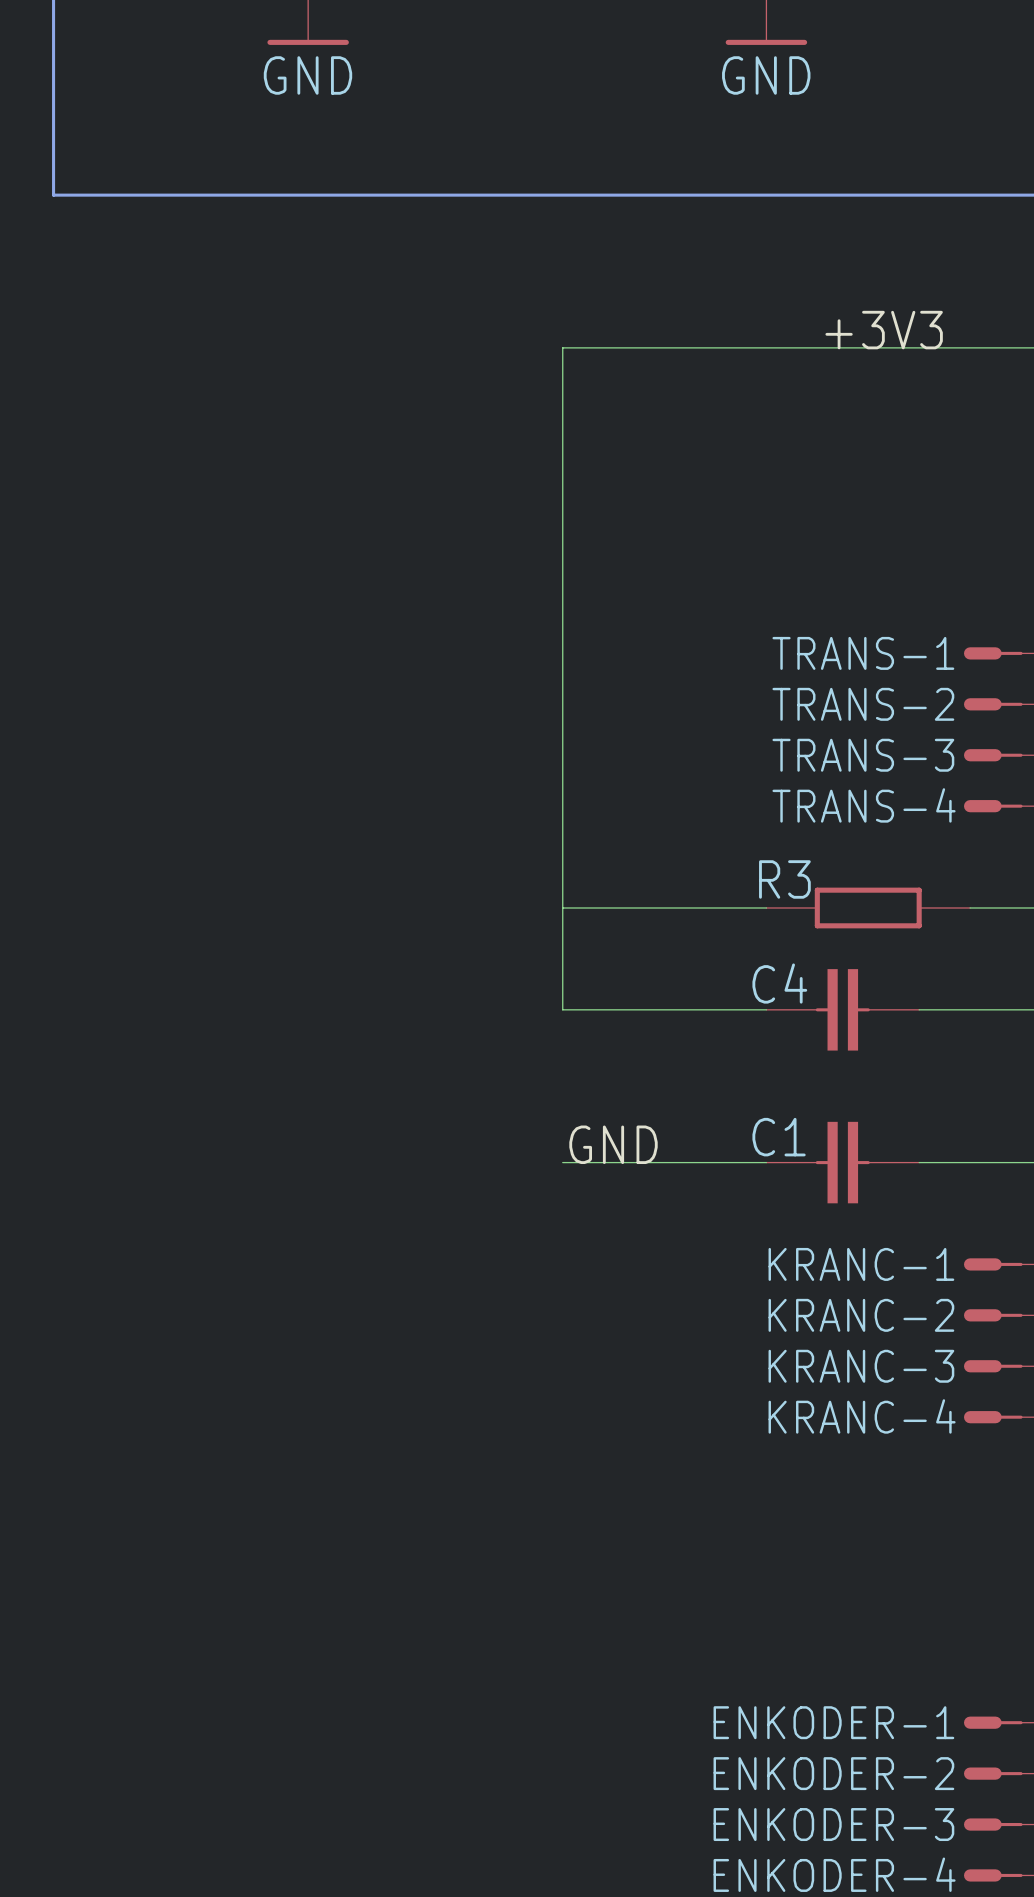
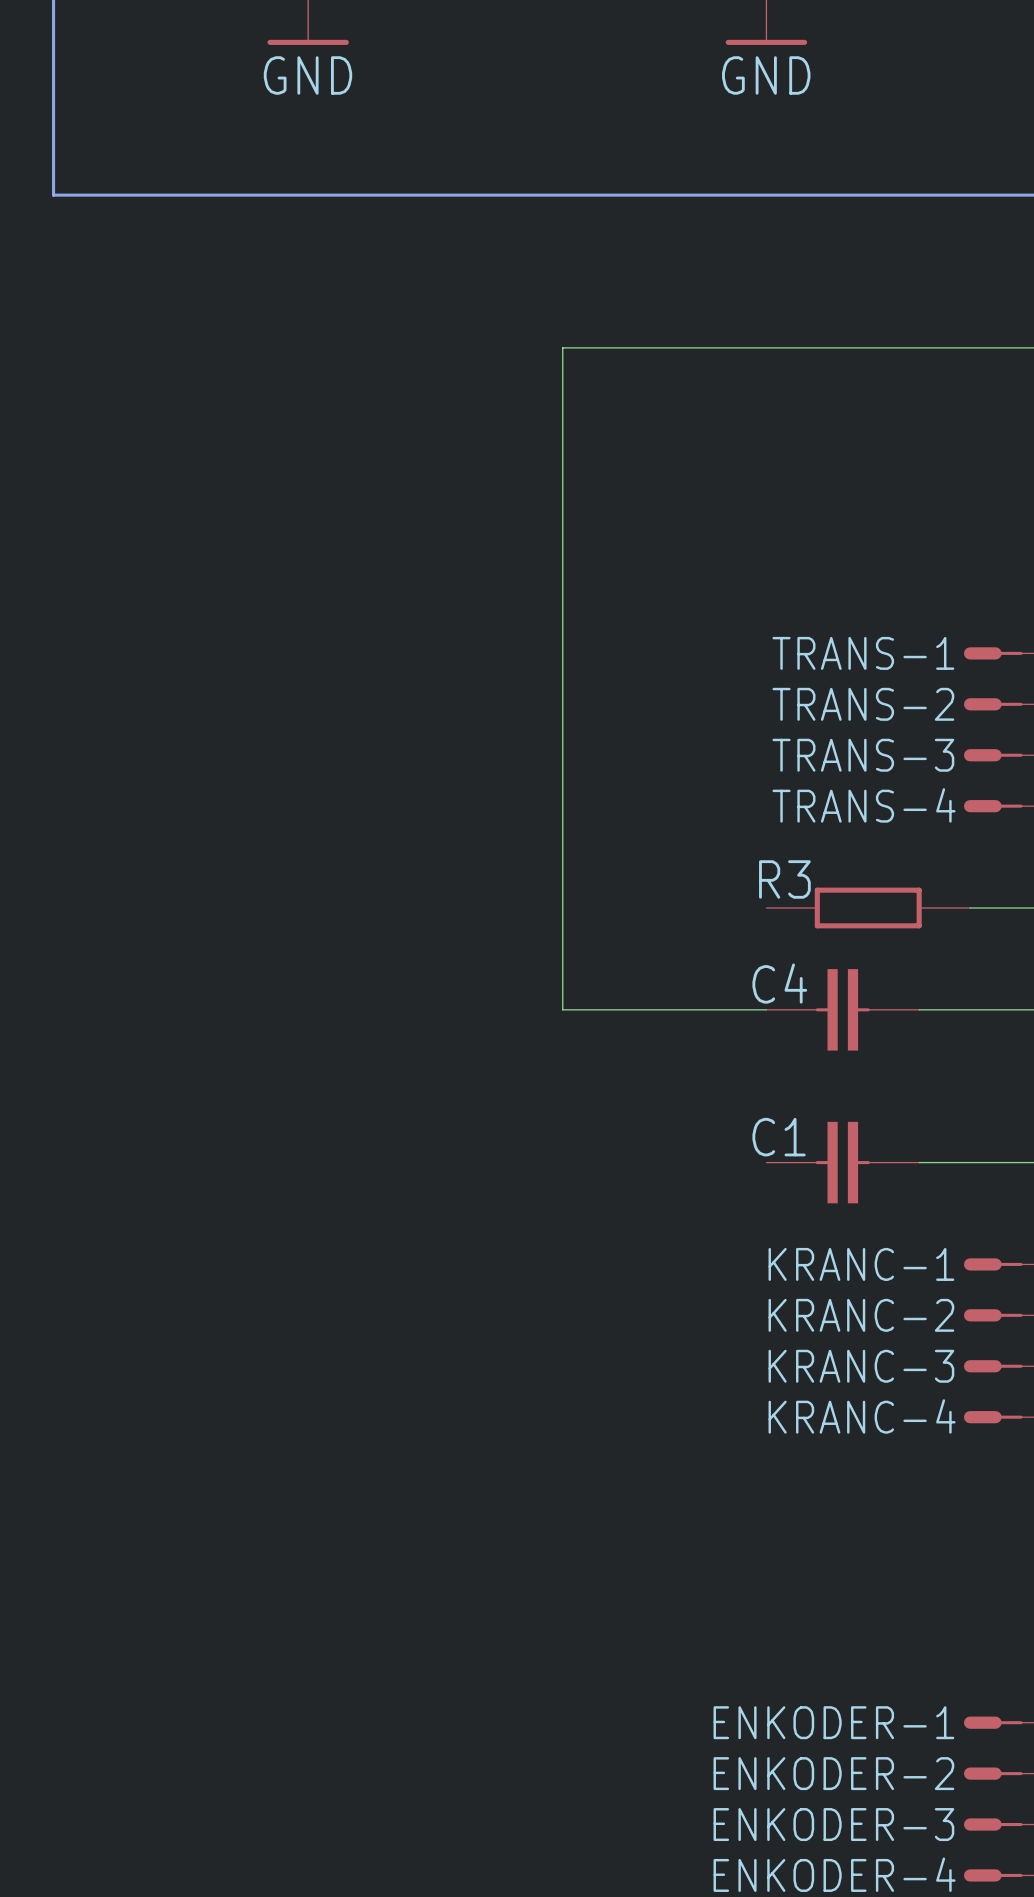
label: +3V3 (884, 330) -> none
wire: (562, 907) (766, 907) -> none
label: GND (613, 1144) -> none
wire: (562, 1162) (766, 1162) -> none

